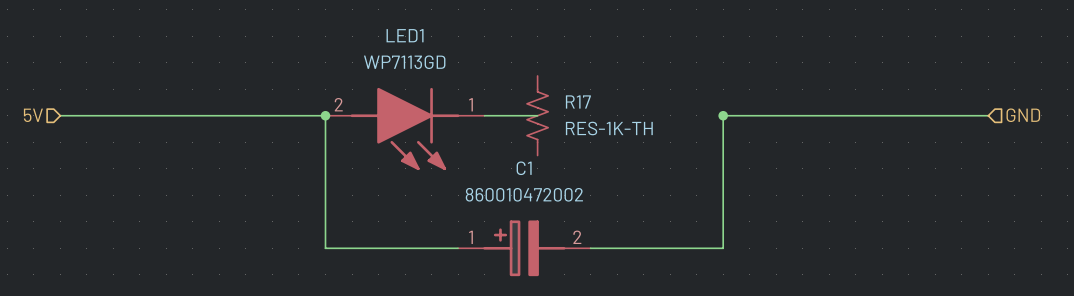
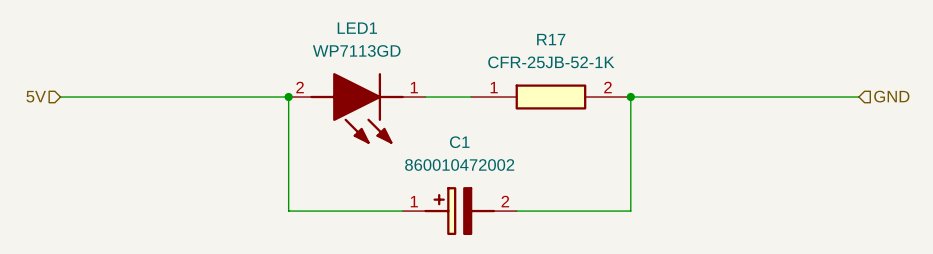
R17 symbol: [526, 75, 549, 156] -> [471, 84, 631, 110]
R17 name position: R17 (578, 101) -> R17 (551, 39)
R17 value: RES-1K-TH (609, 128) -> CFR-25JB-52-1K (551, 62)

